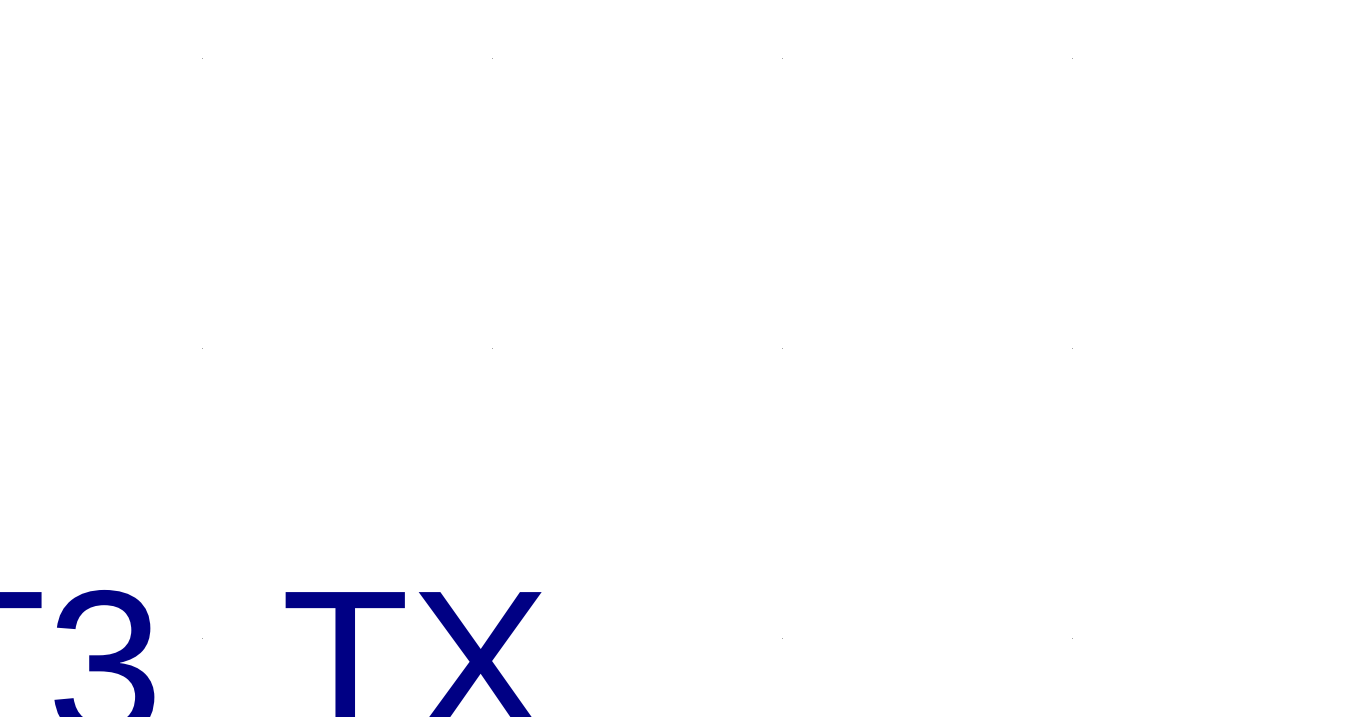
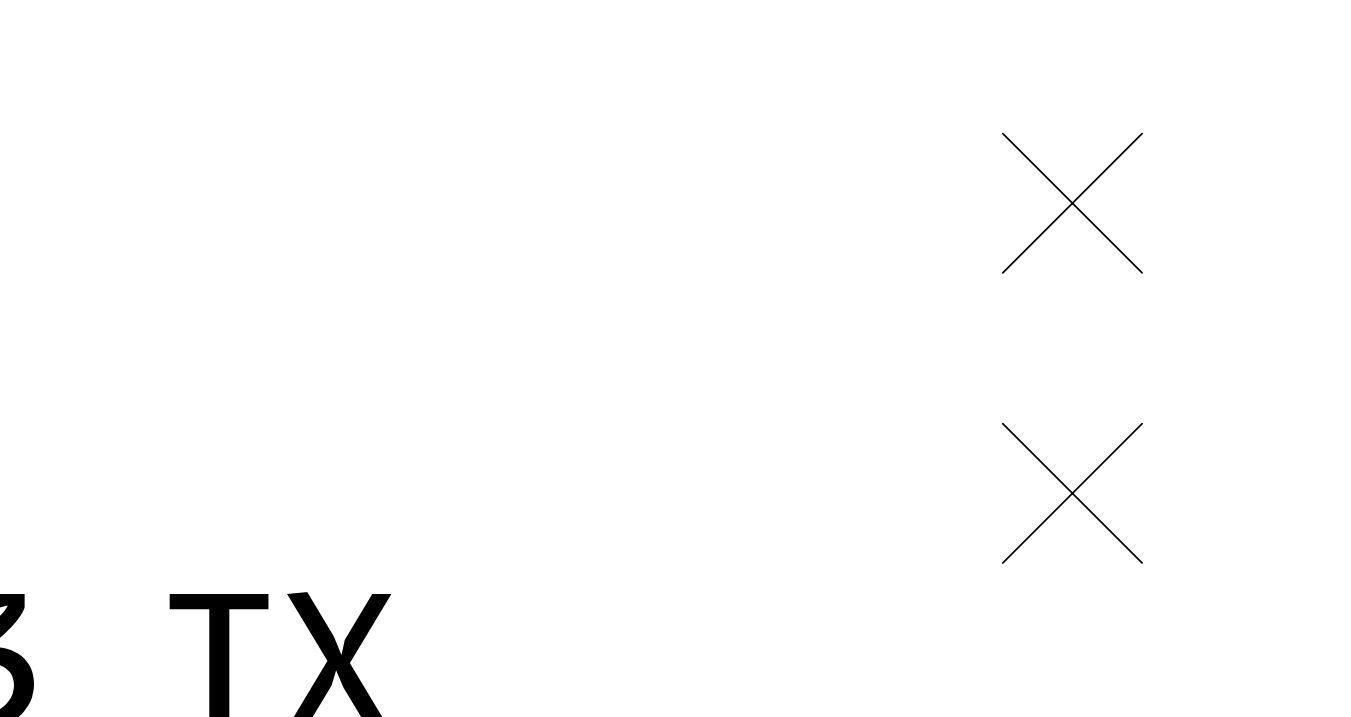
no-connect mark: none -> (1072, 203)
no-connect mark: none -> (1072, 493)

